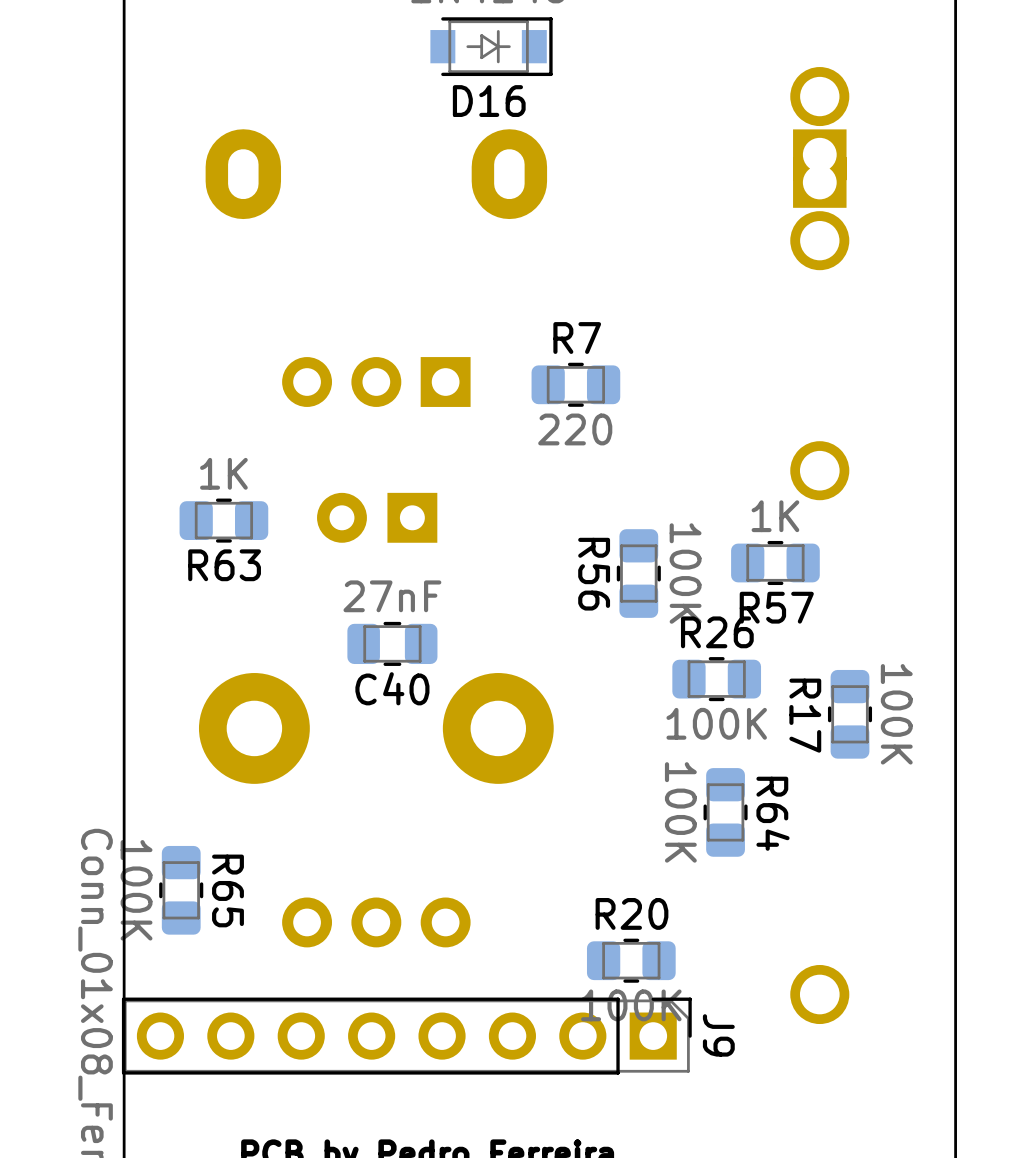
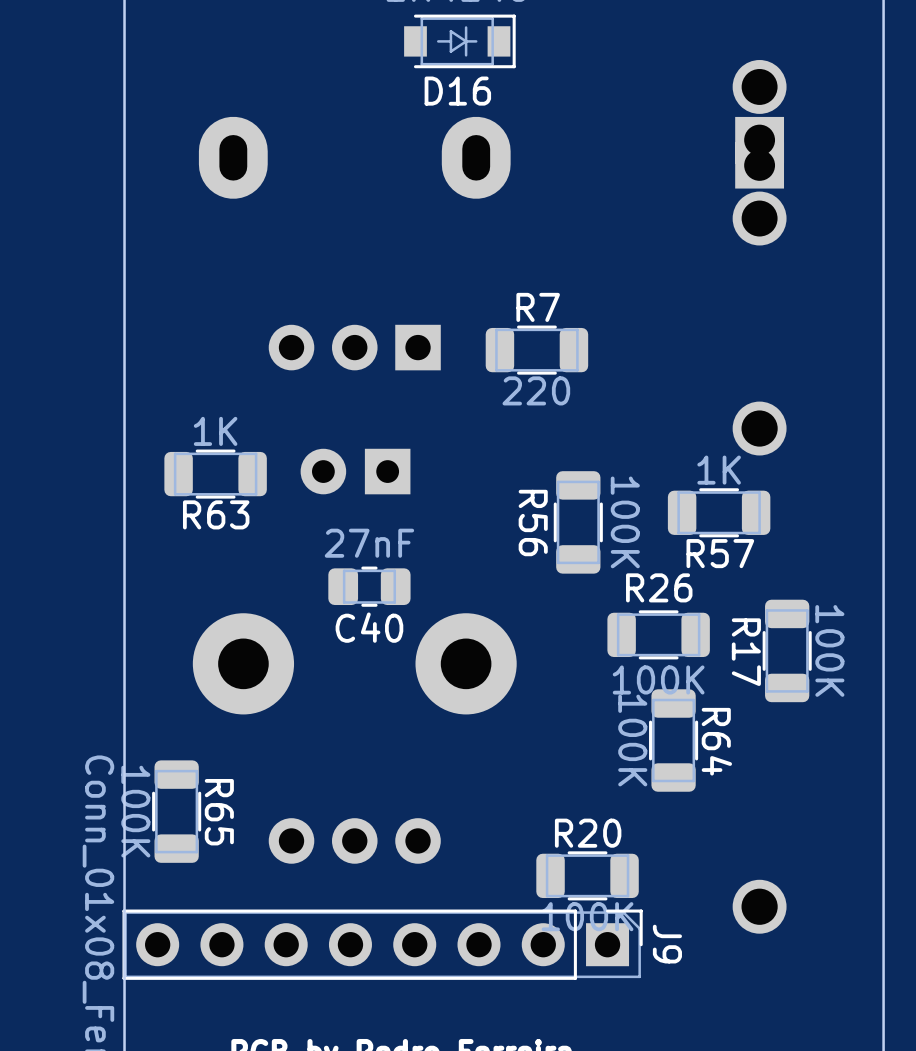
R7 footprint: [531, 362, 621, 407] -> [485, 325, 589, 375]
R63 footprint: [179, 498, 269, 543] -> [164, 449, 267, 499]
R56 footprint: [616, 529, 661, 618] -> [553, 471, 603, 574]
R57 footprint: [731, 540, 820, 586] -> [667, 488, 771, 538]
R26 footprint: [672, 657, 762, 702] -> [607, 610, 710, 660]
R17 footprint: [827, 669, 873, 759] -> [762, 599, 812, 703]
R64 footprint: [703, 768, 748, 857] -> [649, 689, 699, 792]
R65 footprint: [159, 845, 204, 935] -> [152, 760, 202, 863]
R20 footprint: [586, 938, 676, 983] -> [536, 851, 639, 901]

